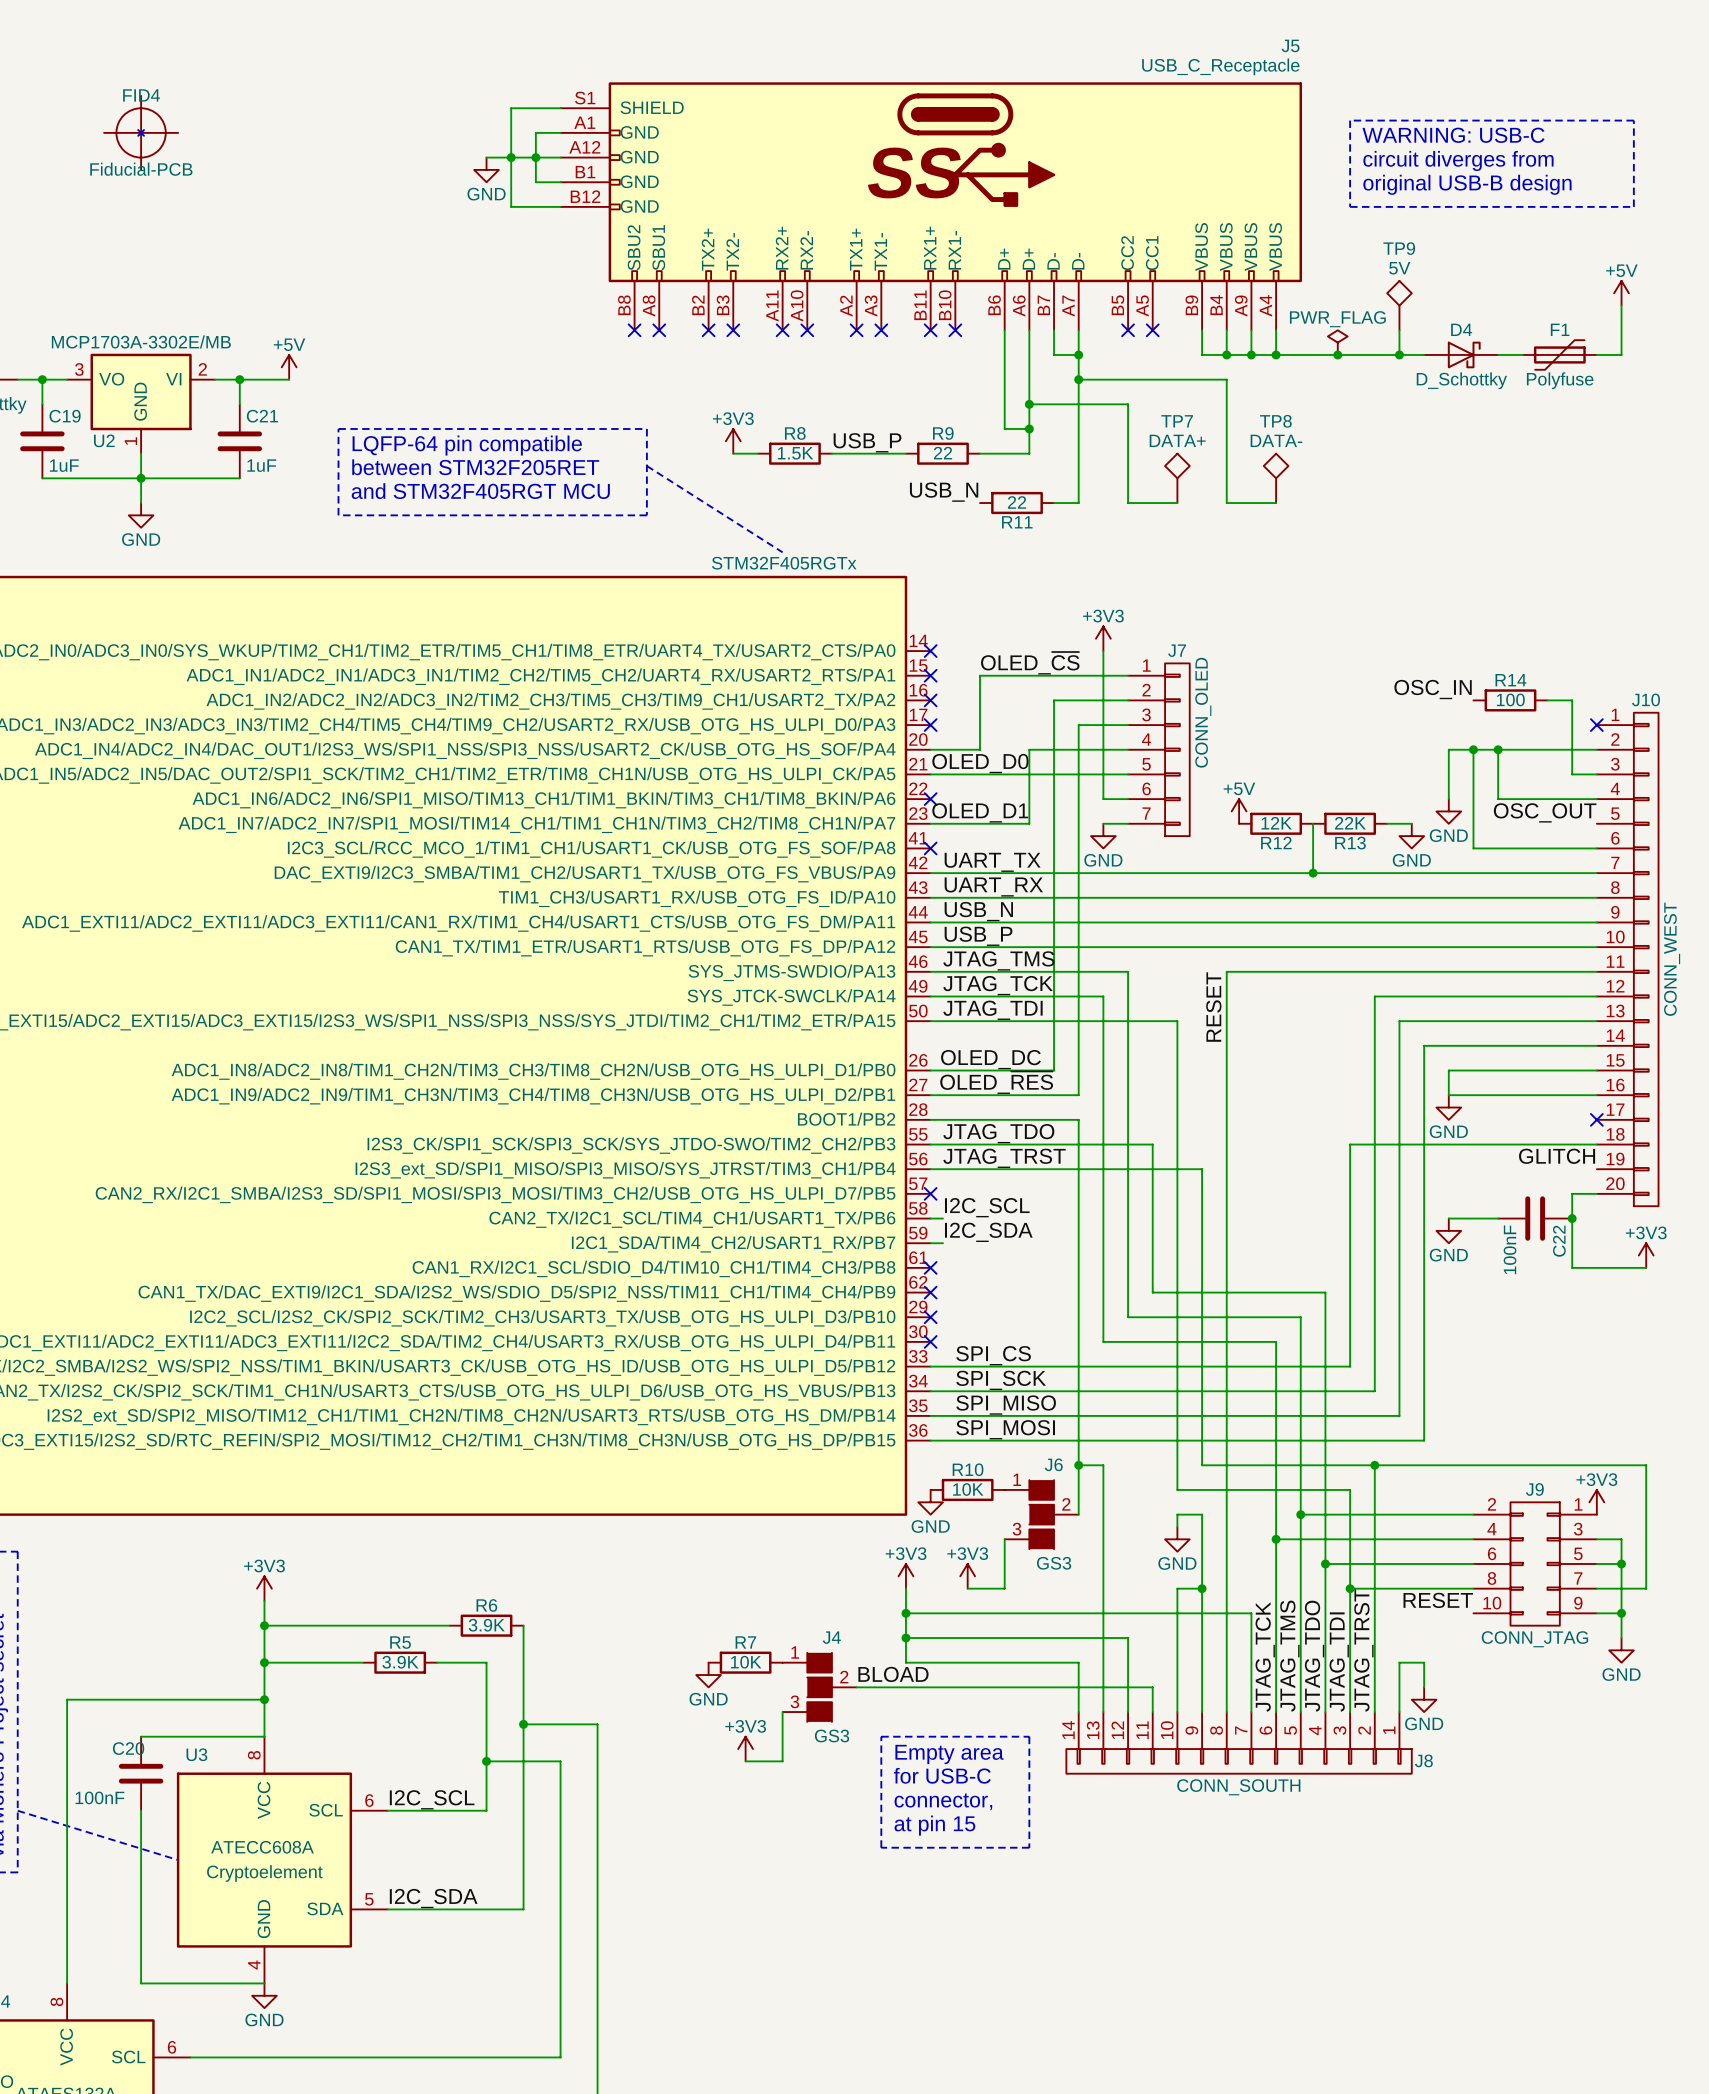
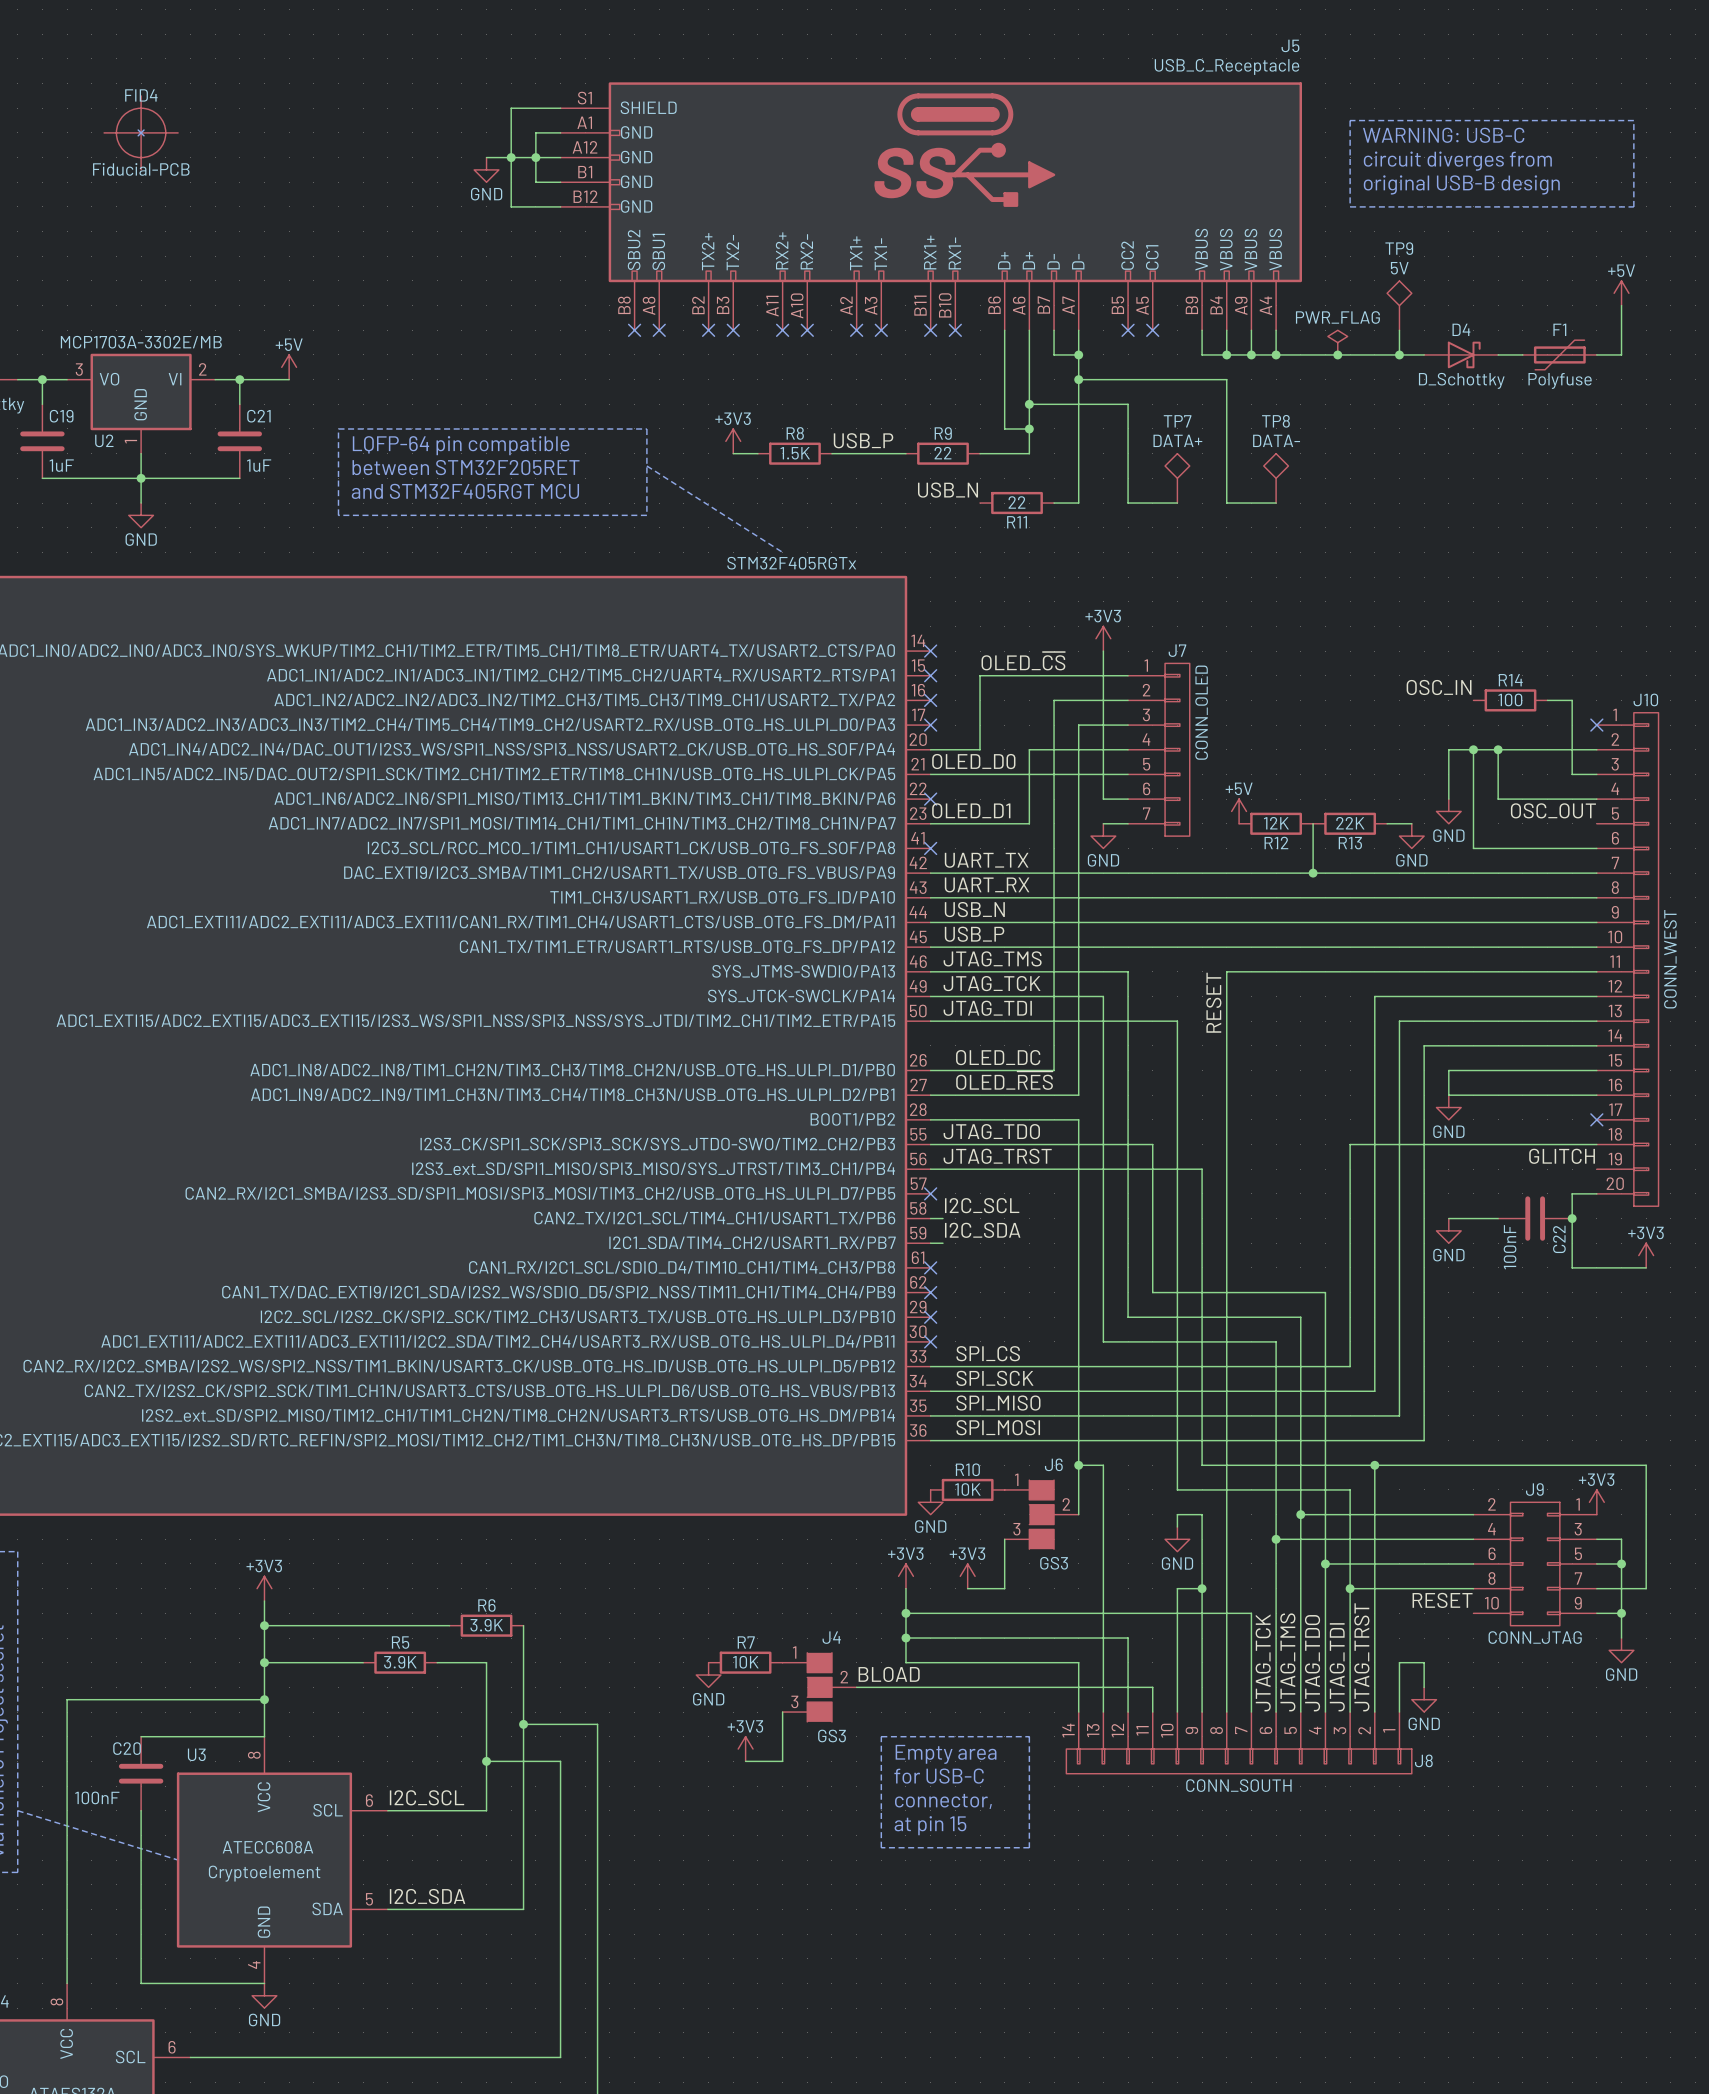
label position: OLED_D0 (980, 763) -> OLED_D0 (973, 761)
label position: OLED_D1 (980, 812) -> OLED_D1 (971, 810)

